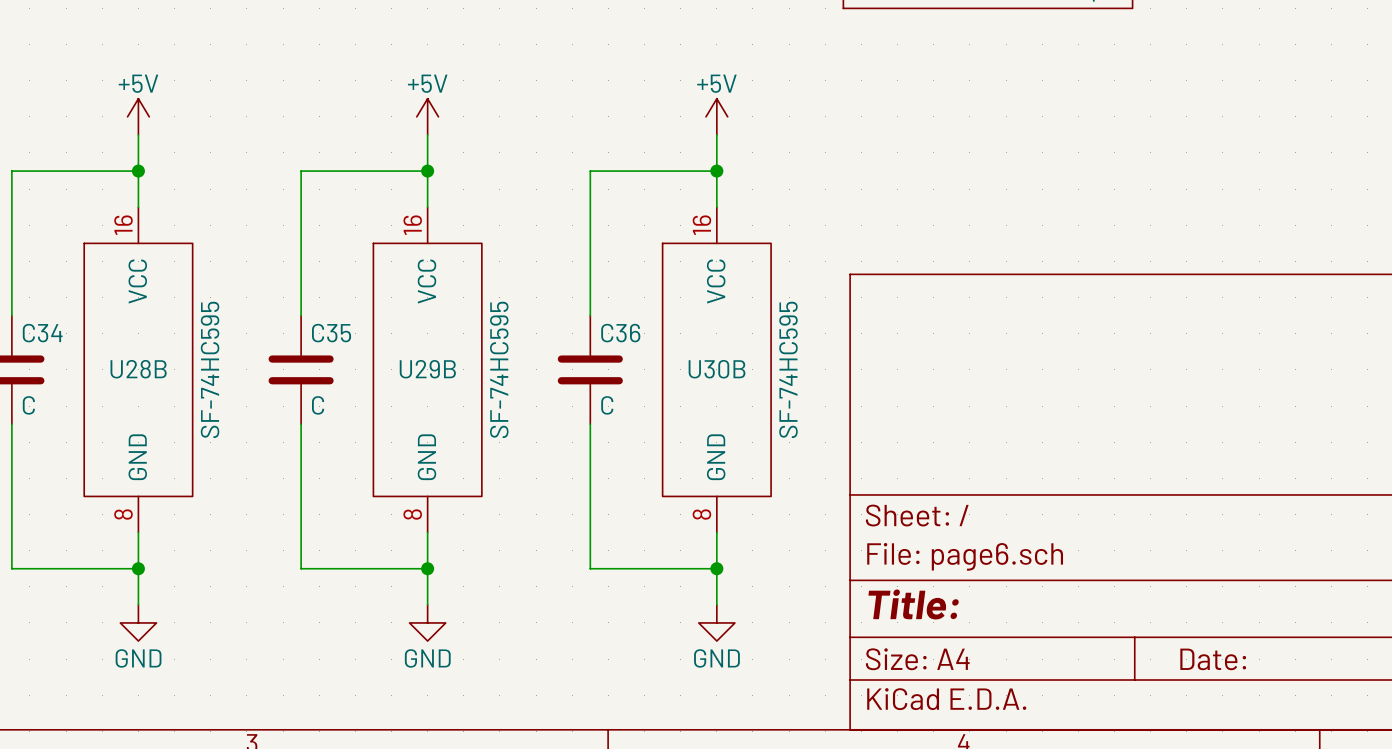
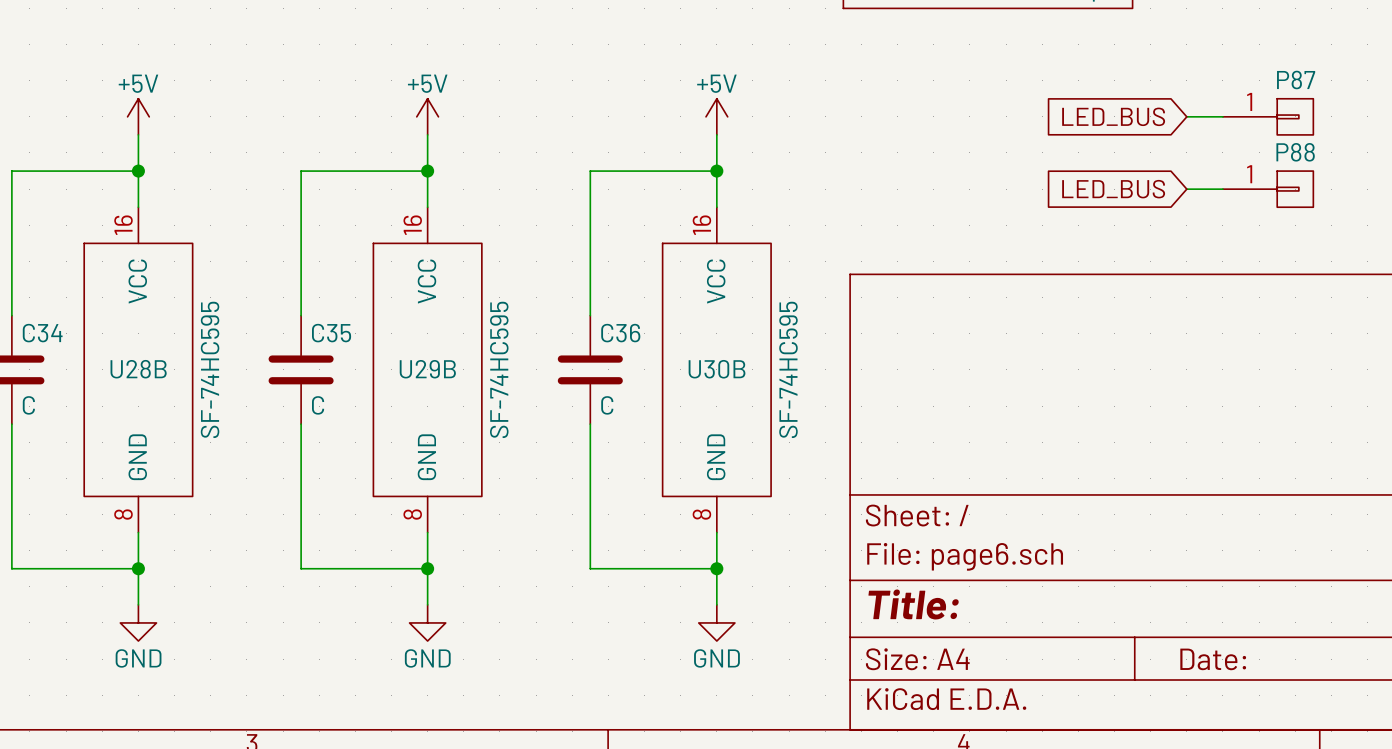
global label: none -> LED_BUS (1113, 116)
wire: none -> (1186, 116) (1222, 116)
P87: none -> (1268, 116)
global label: none -> LED_BUS (1113, 189)
wire: none -> (1186, 189) (1222, 189)
P88: none -> (1268, 189)

